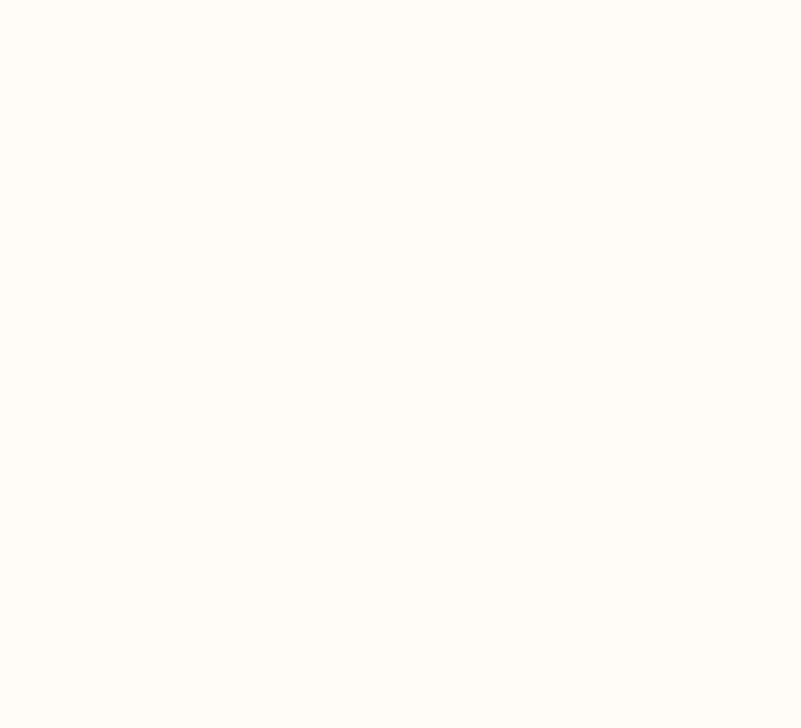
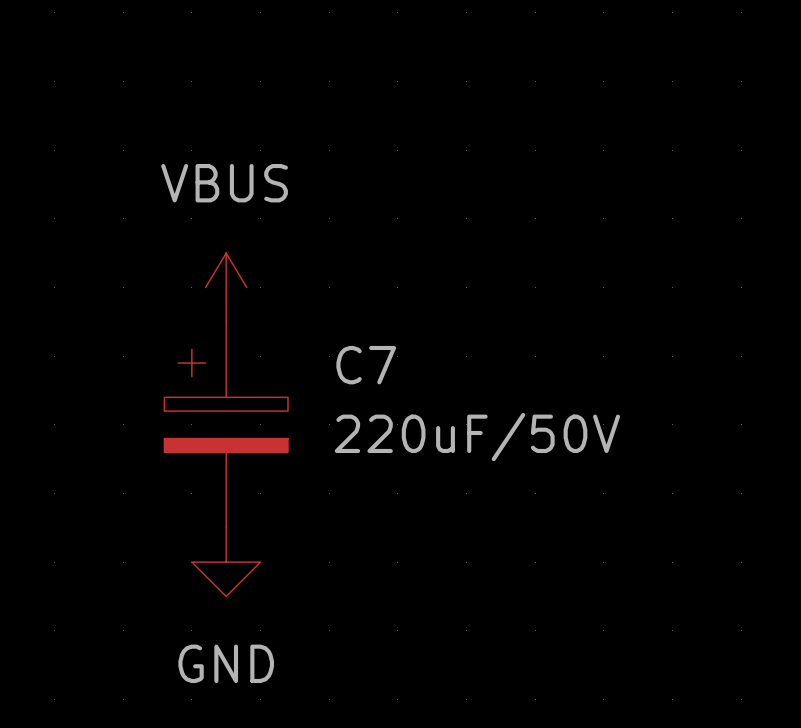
power symbol: none -> VBUS (226, 287)
C7: none -> 220uF/50V (226, 424)
power symbol: none -> GND (226, 562)

